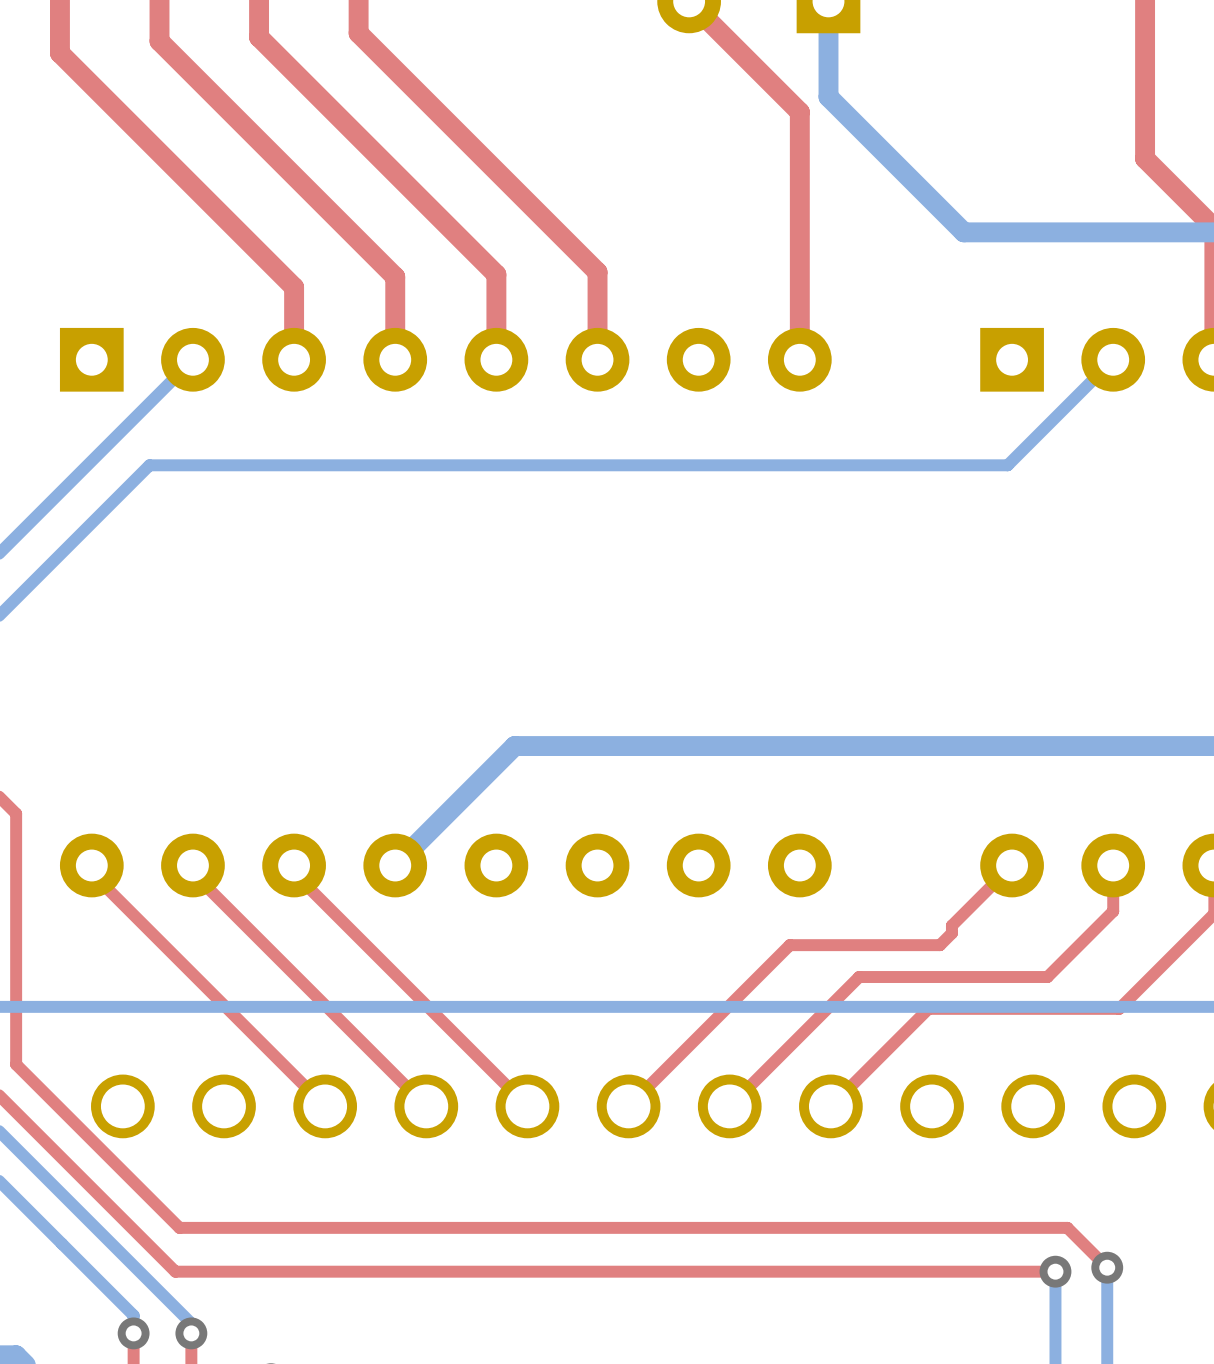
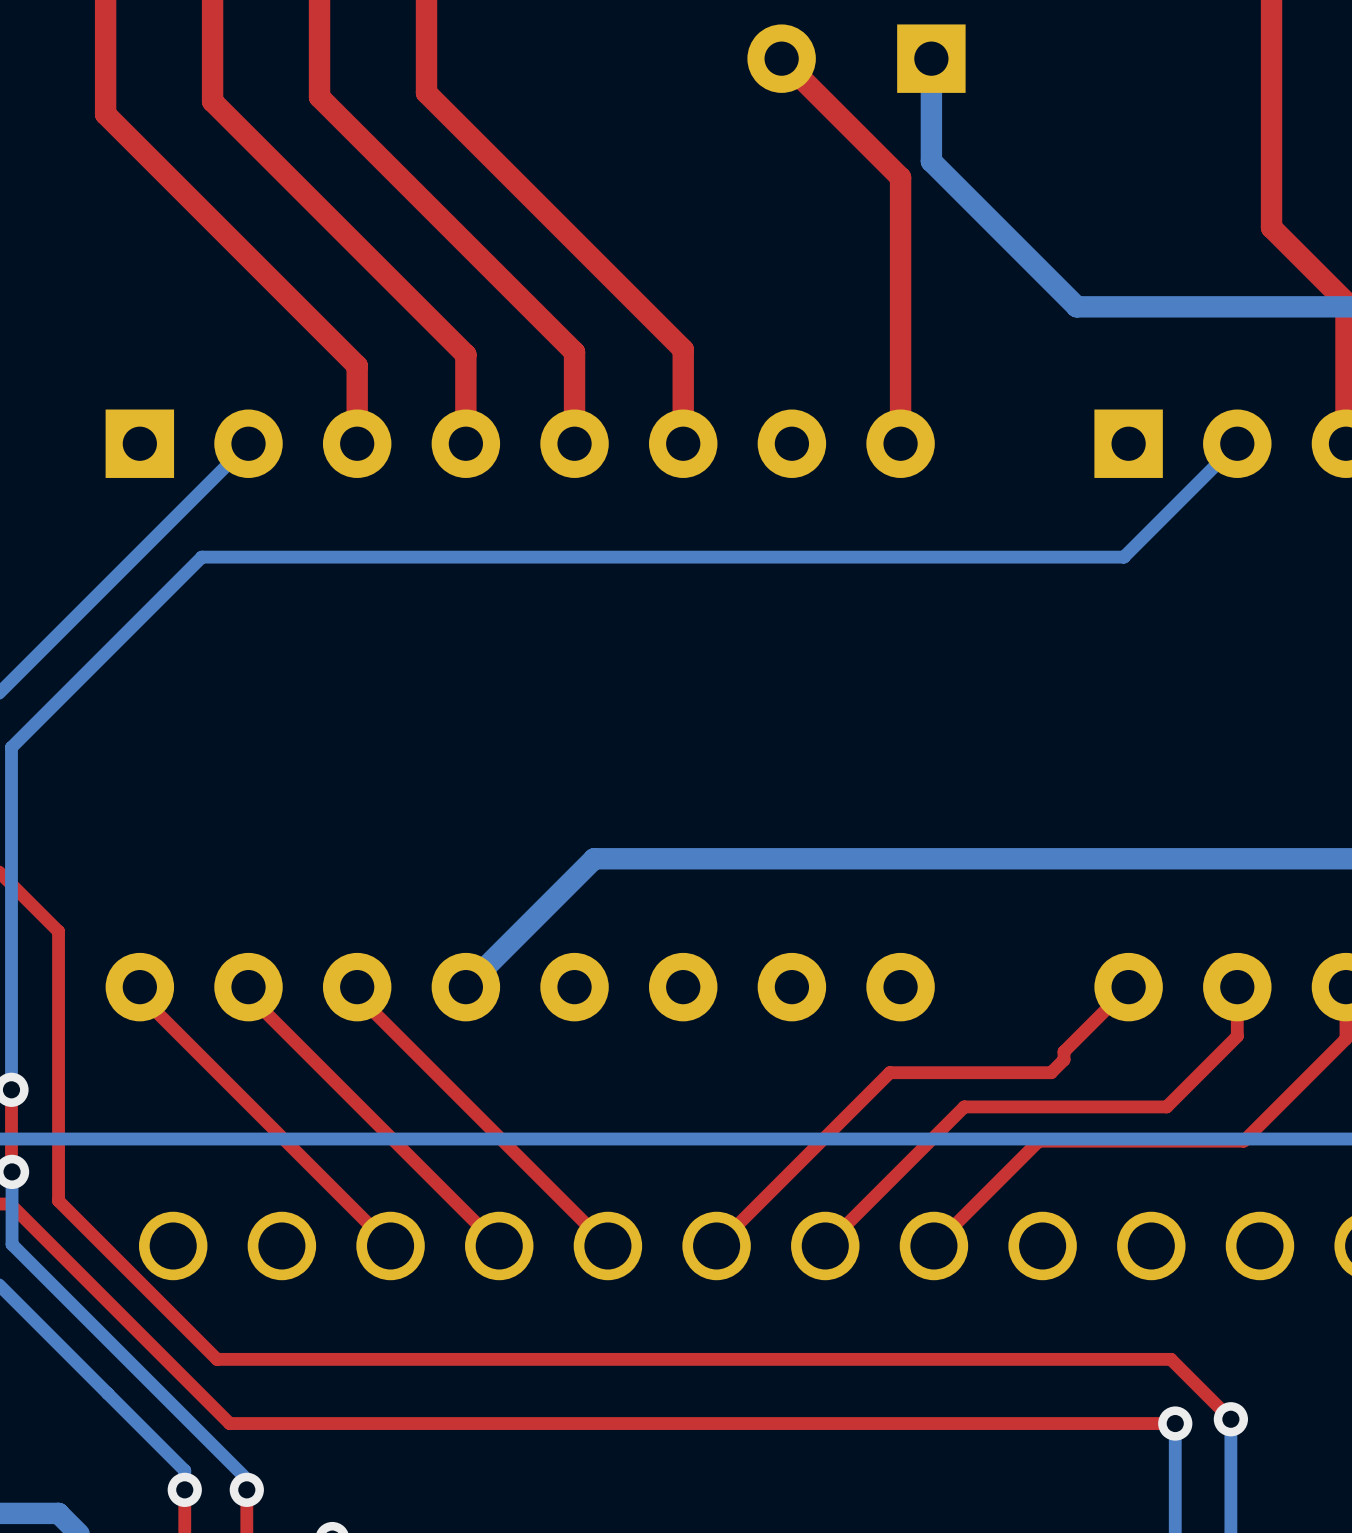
top track: (163, 1211) (179, 1227) (1067, 1227) -> (217, 1359) (1170, 1359) (1188, 1376)

